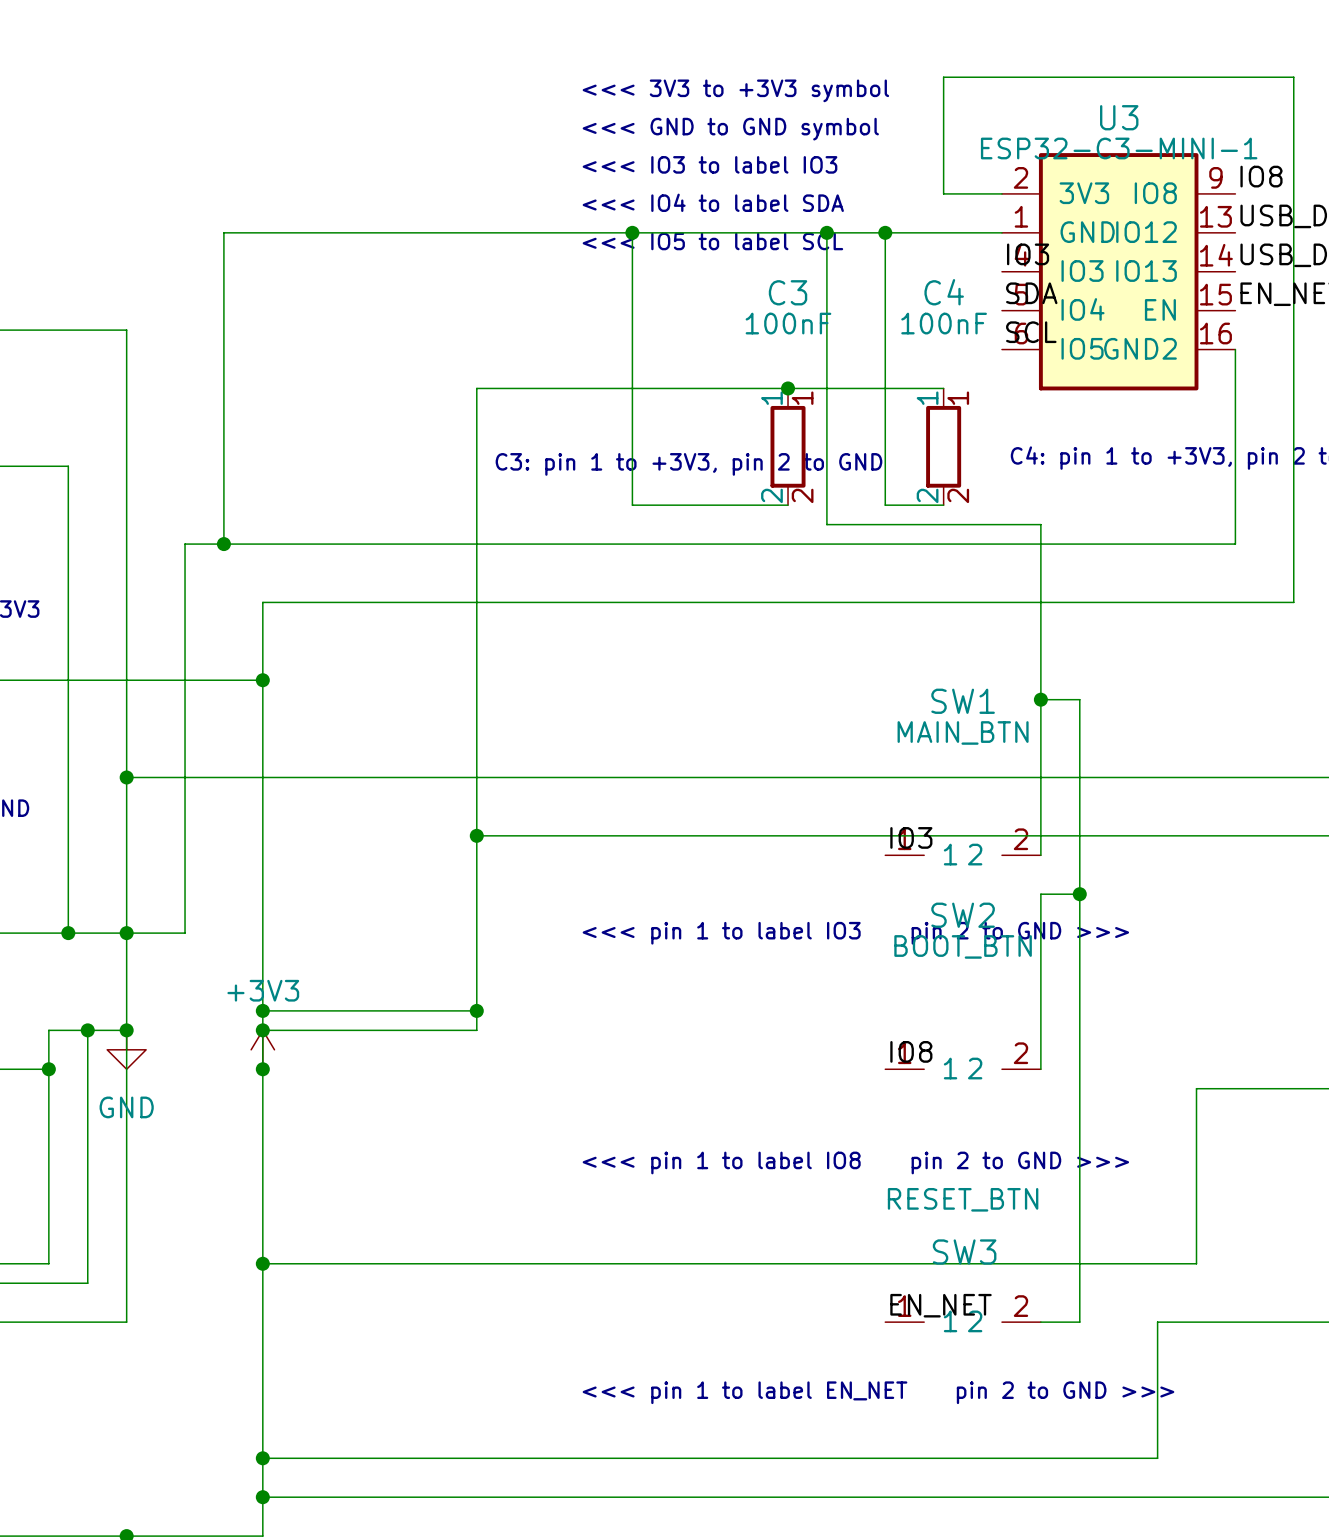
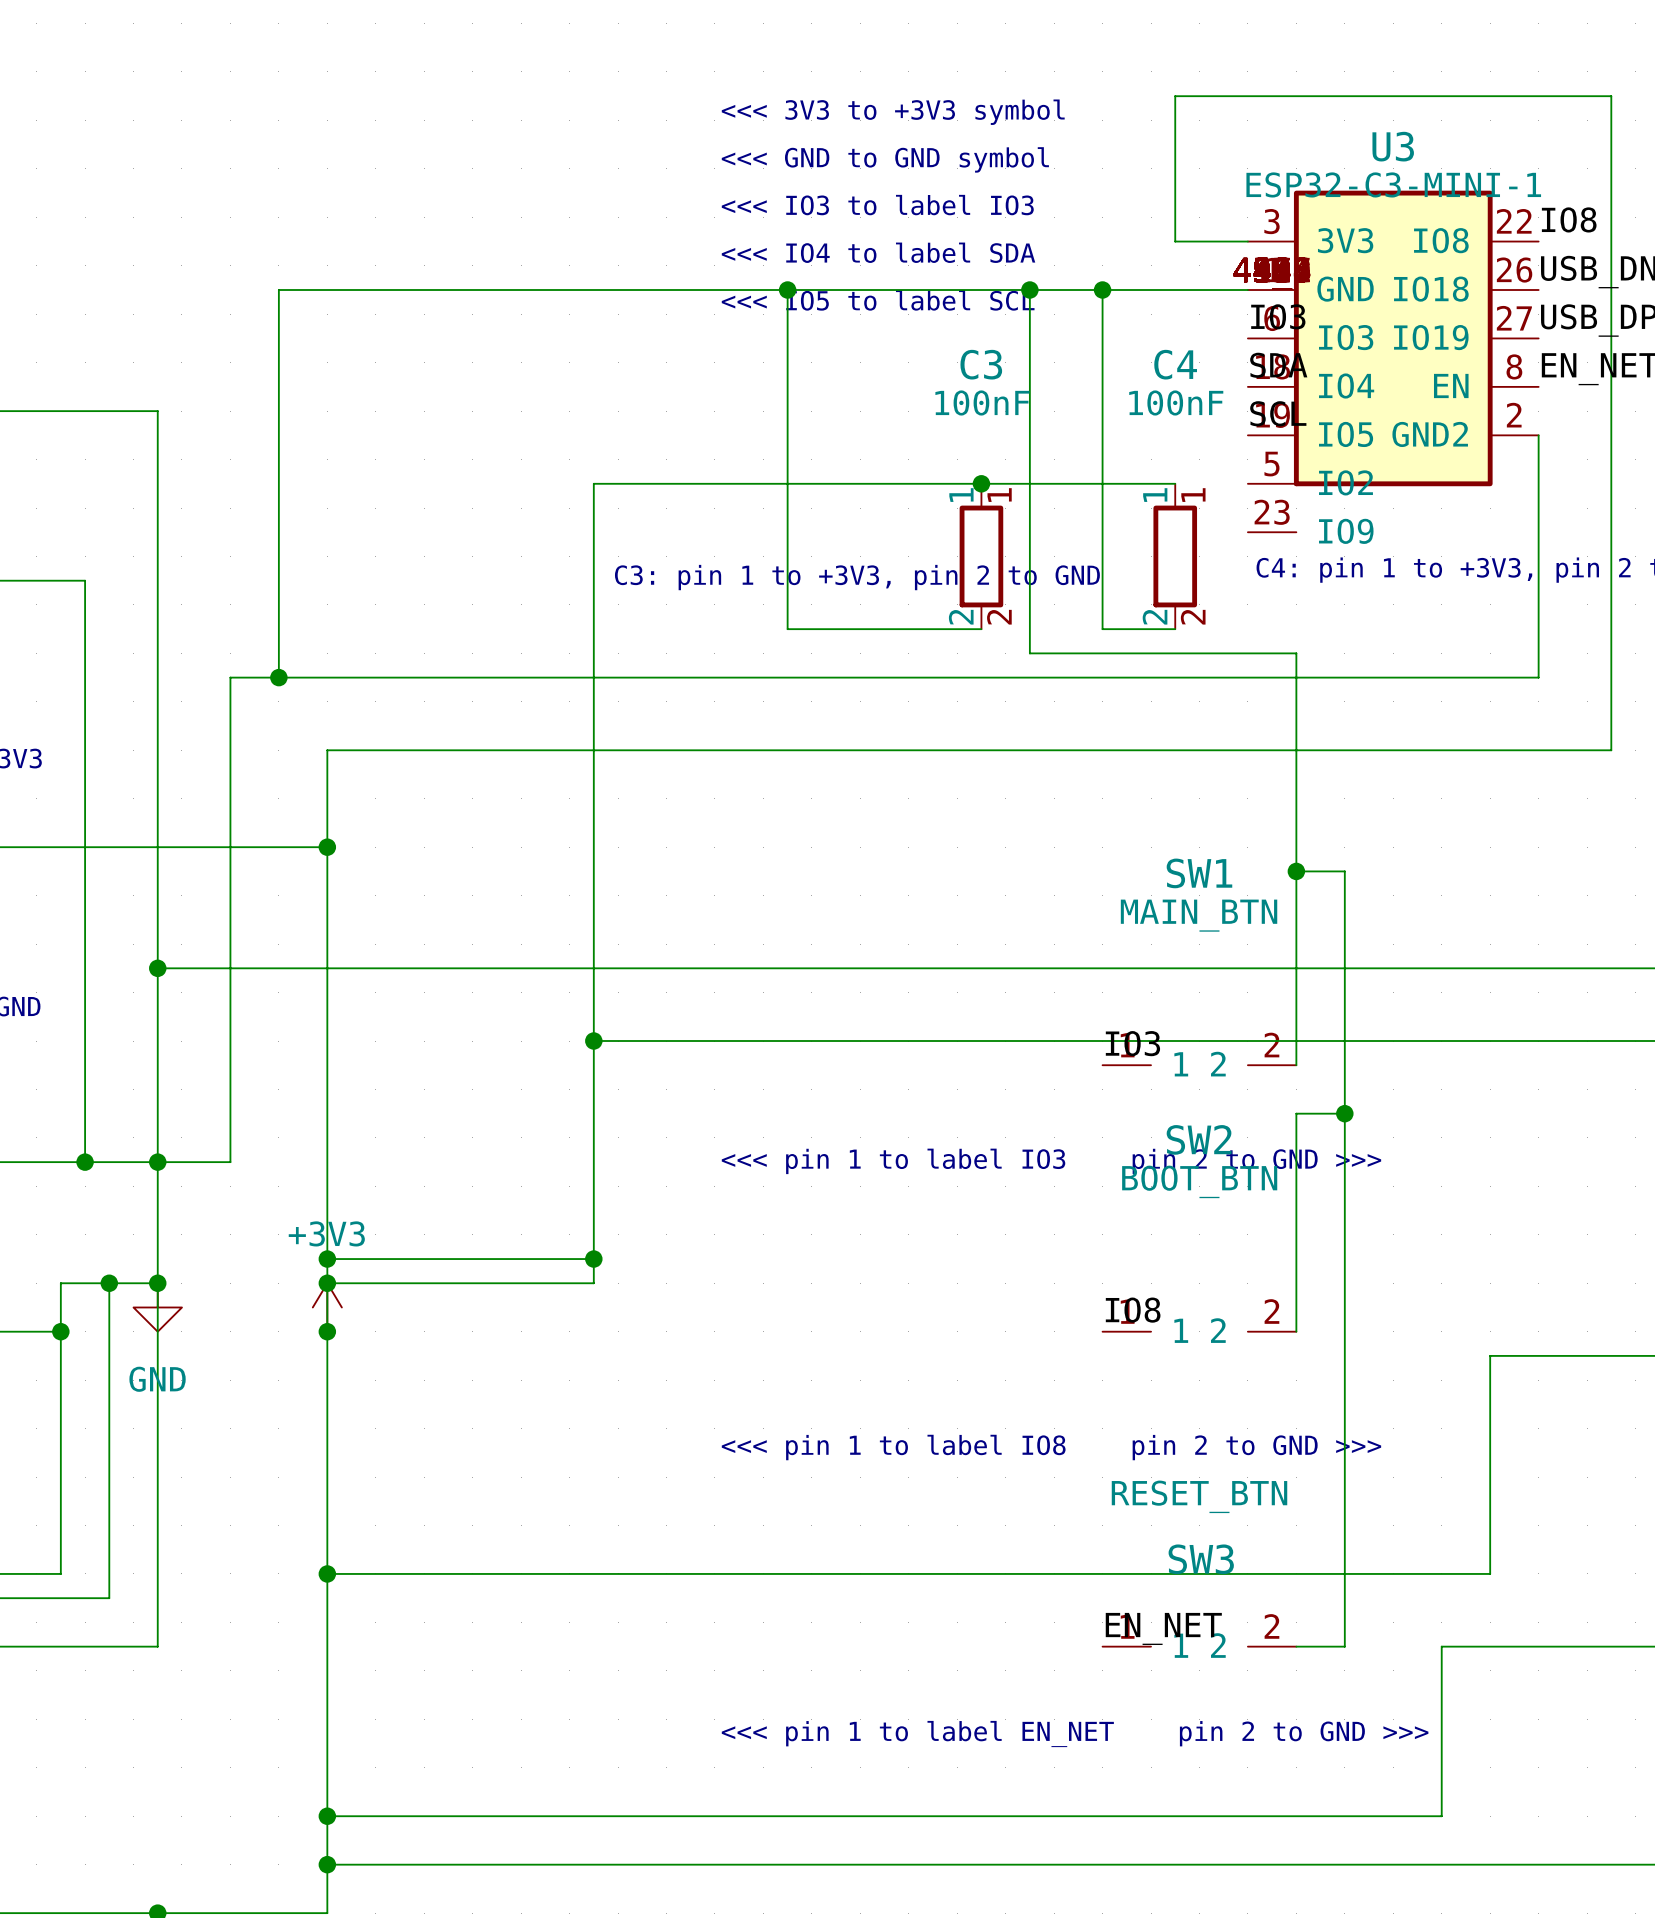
U3 symbol: [1001, 153, 1236, 391] -> [1247, 190, 1539, 533]

